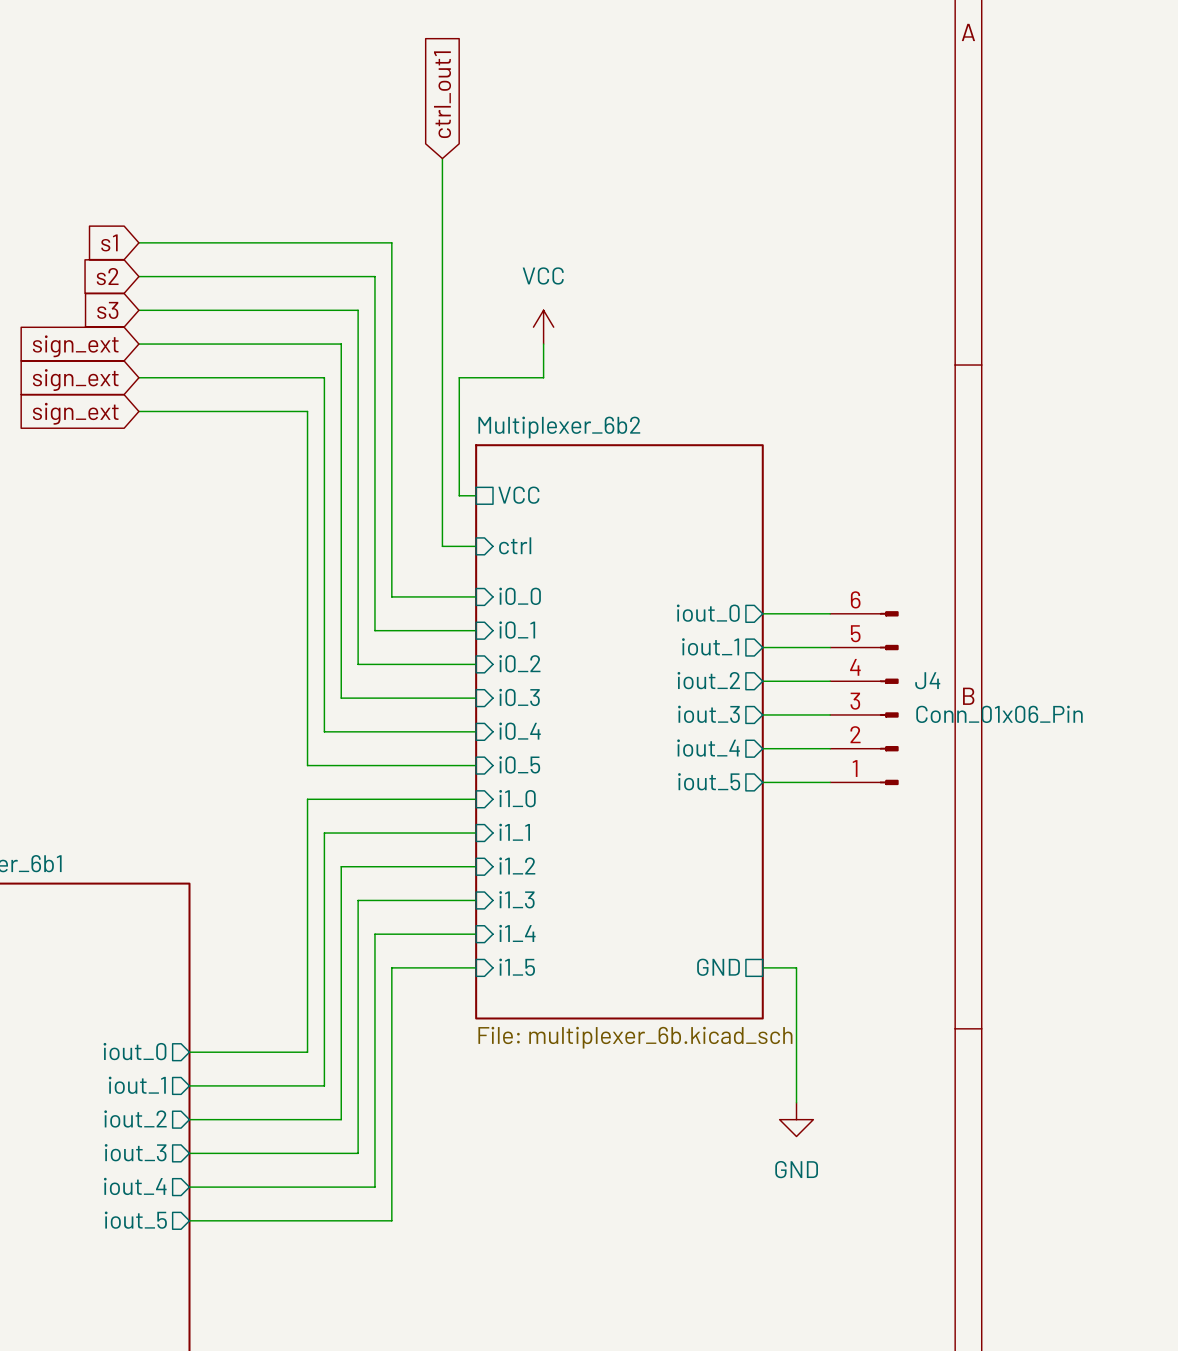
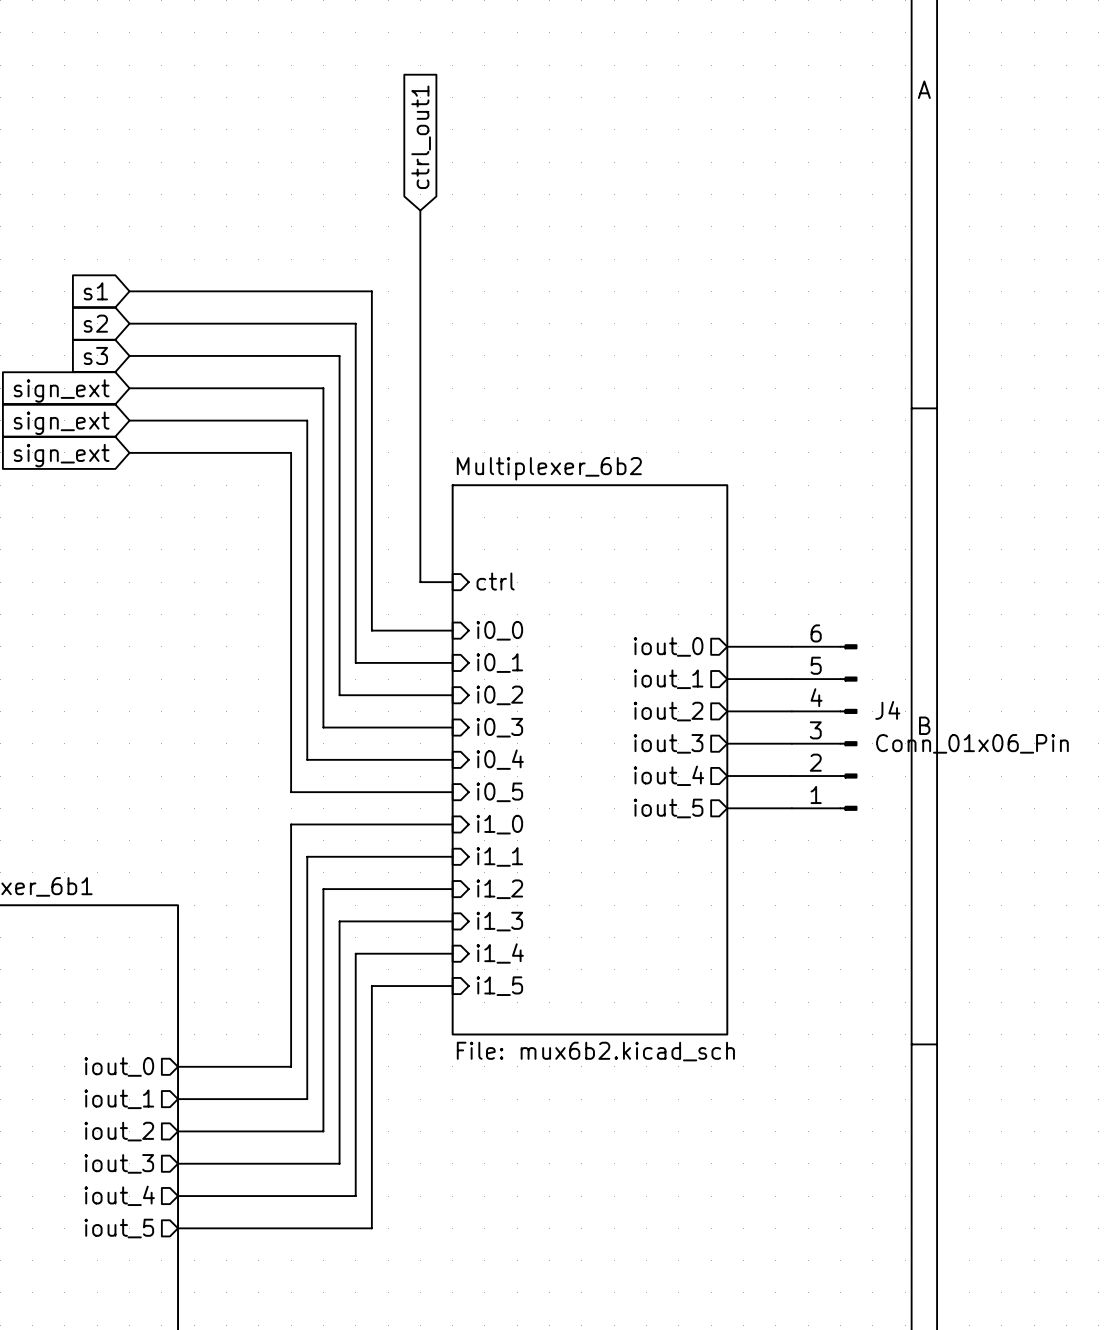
power symbol: VCC (543, 327) -> none
wire: (543, 344) (543, 377) (459, 377) (459, 495) (476, 495) -> none
sheet pin: VCC (518, 495) -> none
sheet pin: GND (718, 967) -> none
wire: (762, 967) (796, 967) (796, 1102) -> none
sheet Multiplexer_6b2 value: File: multiplexer_6b.kicad_sch (635, 1037) -> File: mux6b2.kicad_sch (595, 1051)
power symbol: GND (796, 1119) -> none

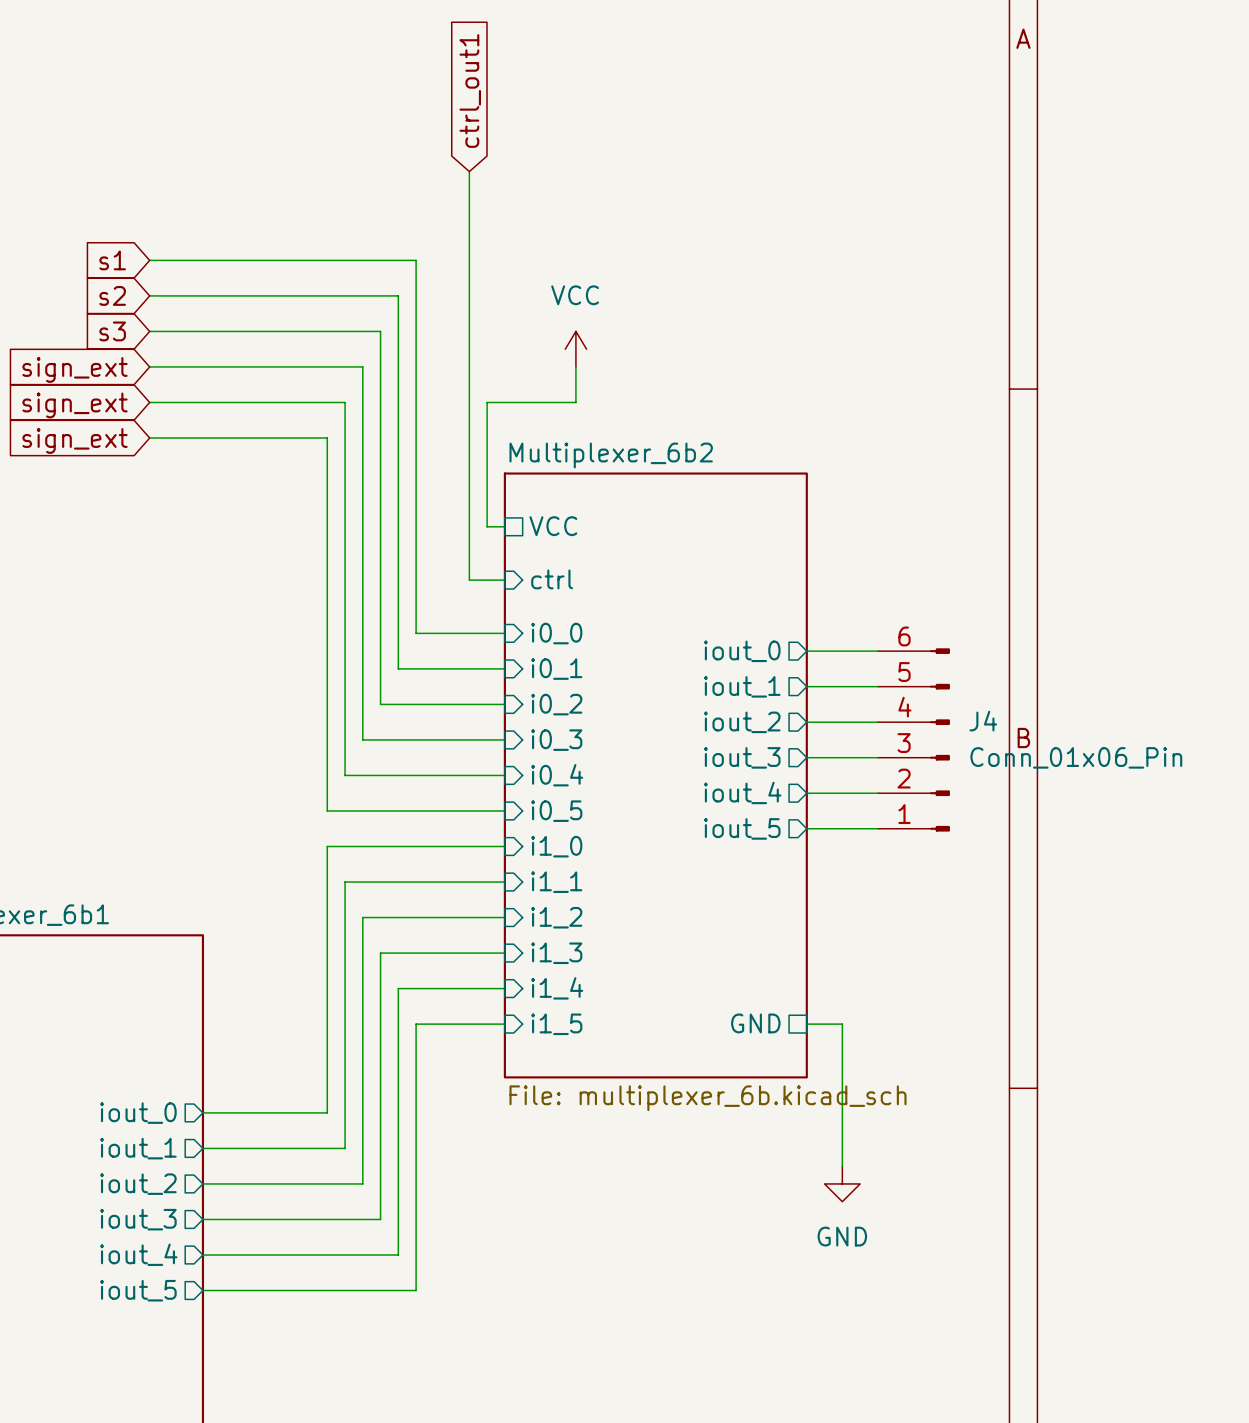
power symbol: none -> VCC (575, 349)
wire: none -> (575, 366) (575, 402) (487, 402) (487, 526) (504, 526)
sheet pin: none -> VCC (553, 526)
sheet pin: none -> GND (755, 1023)
wire: none -> (806, 1024) (842, 1024) (842, 1166)
sheet Multiplexer_6b2 value: File: mux6b2.kicad_sch (595, 1051) -> File: multiplexer_6b.kicad_sch (708, 1098)
power symbol: none -> GND (842, 1183)

